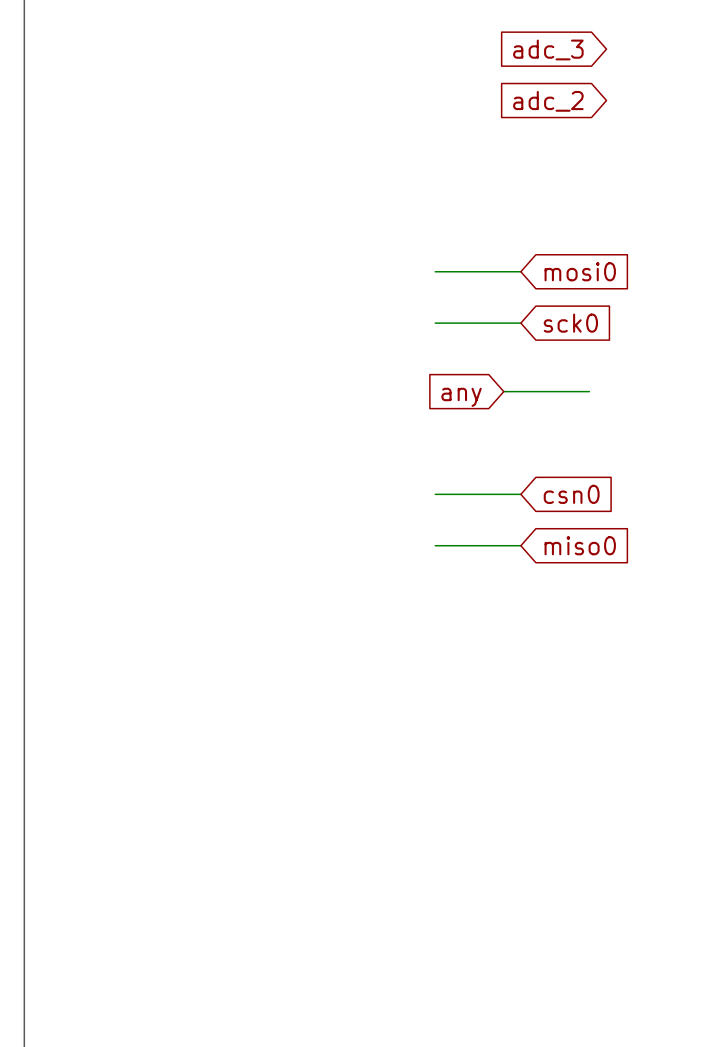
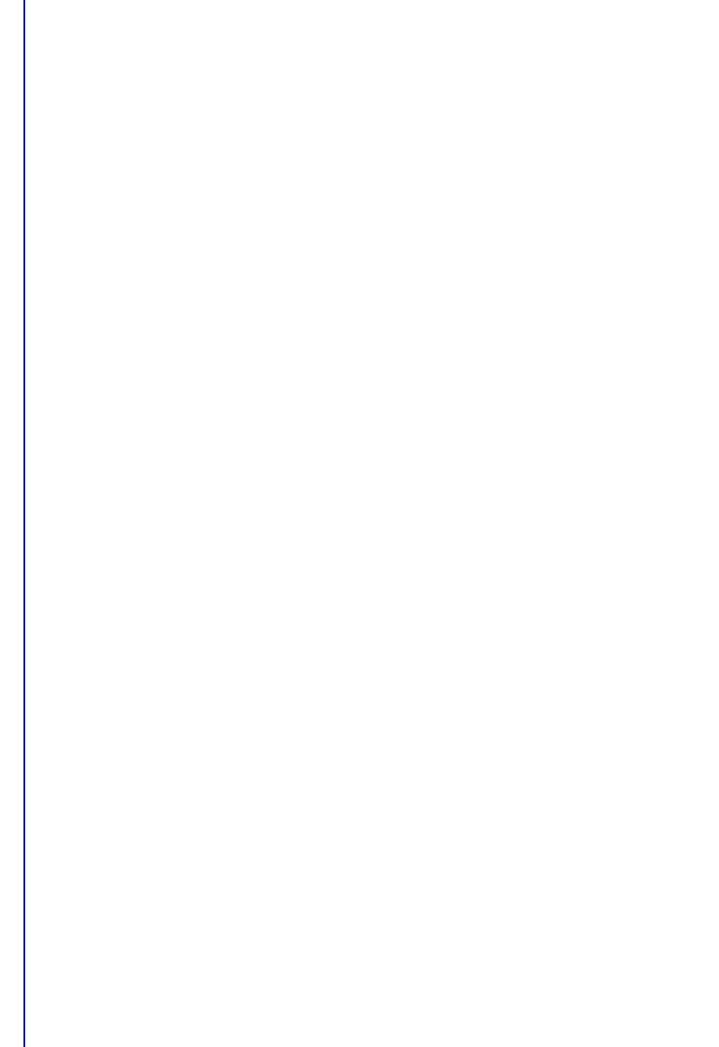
global label: adc_3 (548, 49) -> none
global label: adc_2 (548, 101) -> none
wire: (435, 271) (520, 271) -> none
global label: mosi0 (580, 271) -> none
wire: (435, 323) (520, 323) -> none
global label: sck0 (570, 323) -> none
wire: (503, 391) (589, 391) -> none
global label: any (461, 397) -> none
wire: (435, 494) (520, 494) -> none
global label: csn0 (571, 494) -> none
wire: (435, 545) (520, 545) -> none
global label: miso0 (580, 545) -> none

